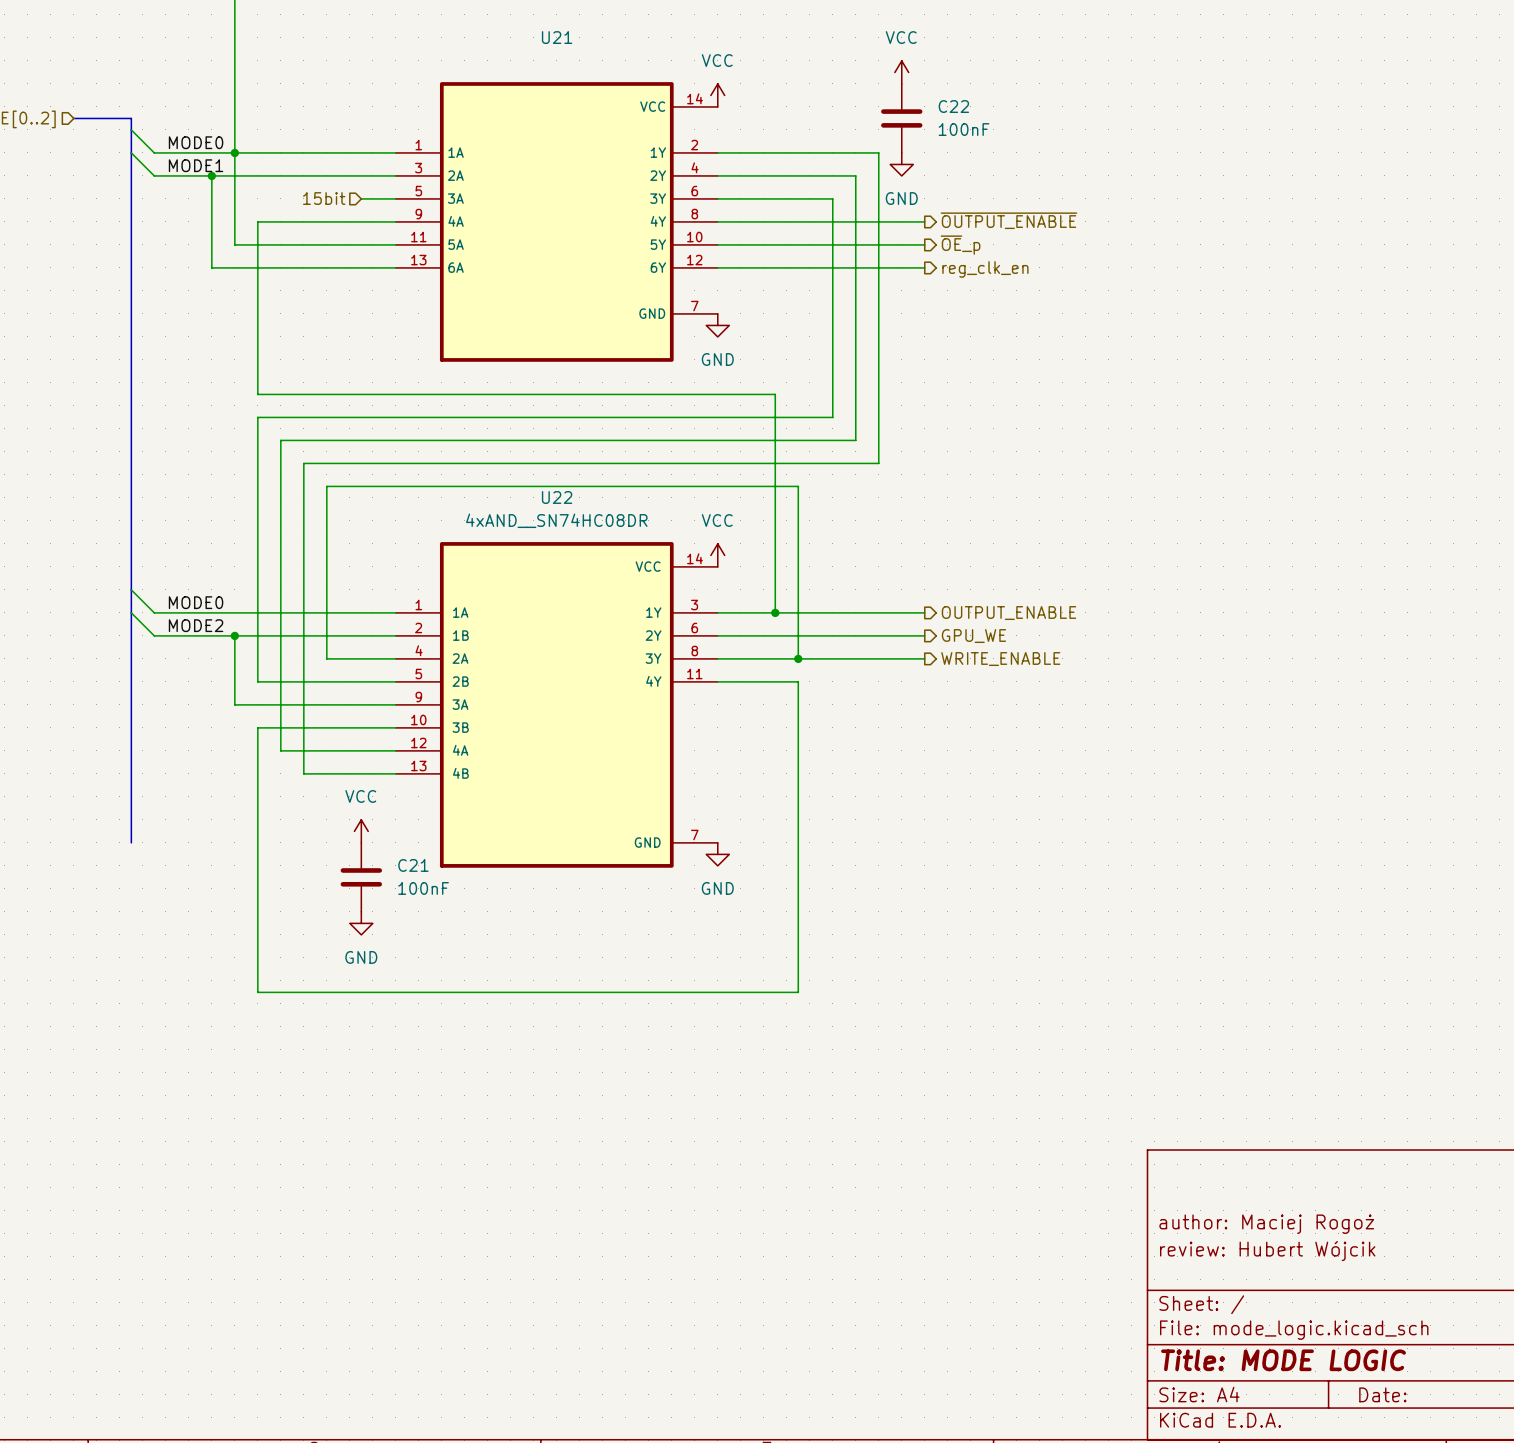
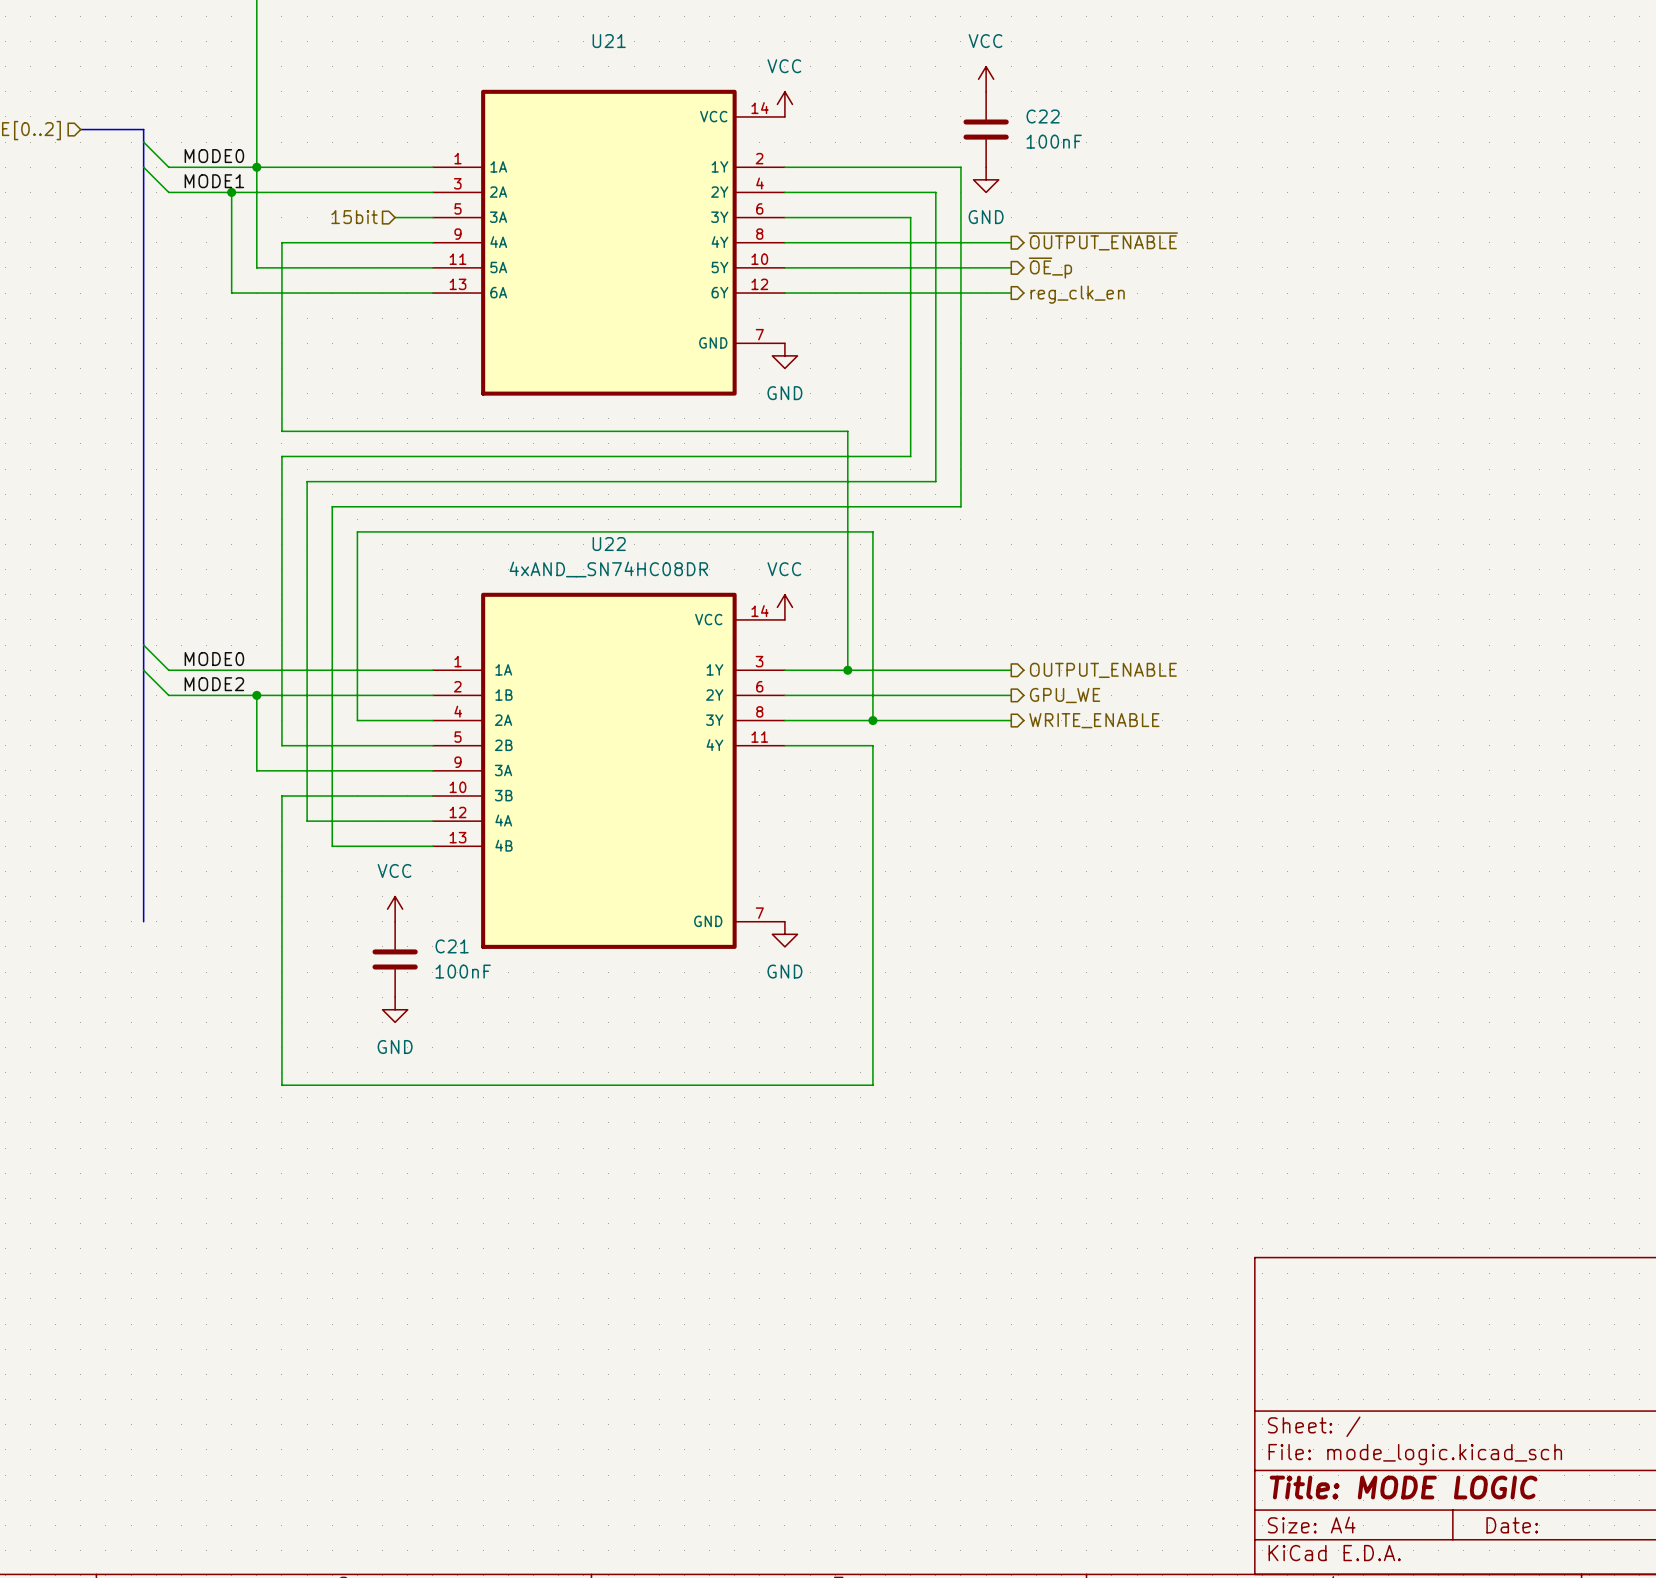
title block: author: Maciej Rogoż (1266, 1224) -> none
title block: review: Hubert Wójcik (1267, 1251) -> none

